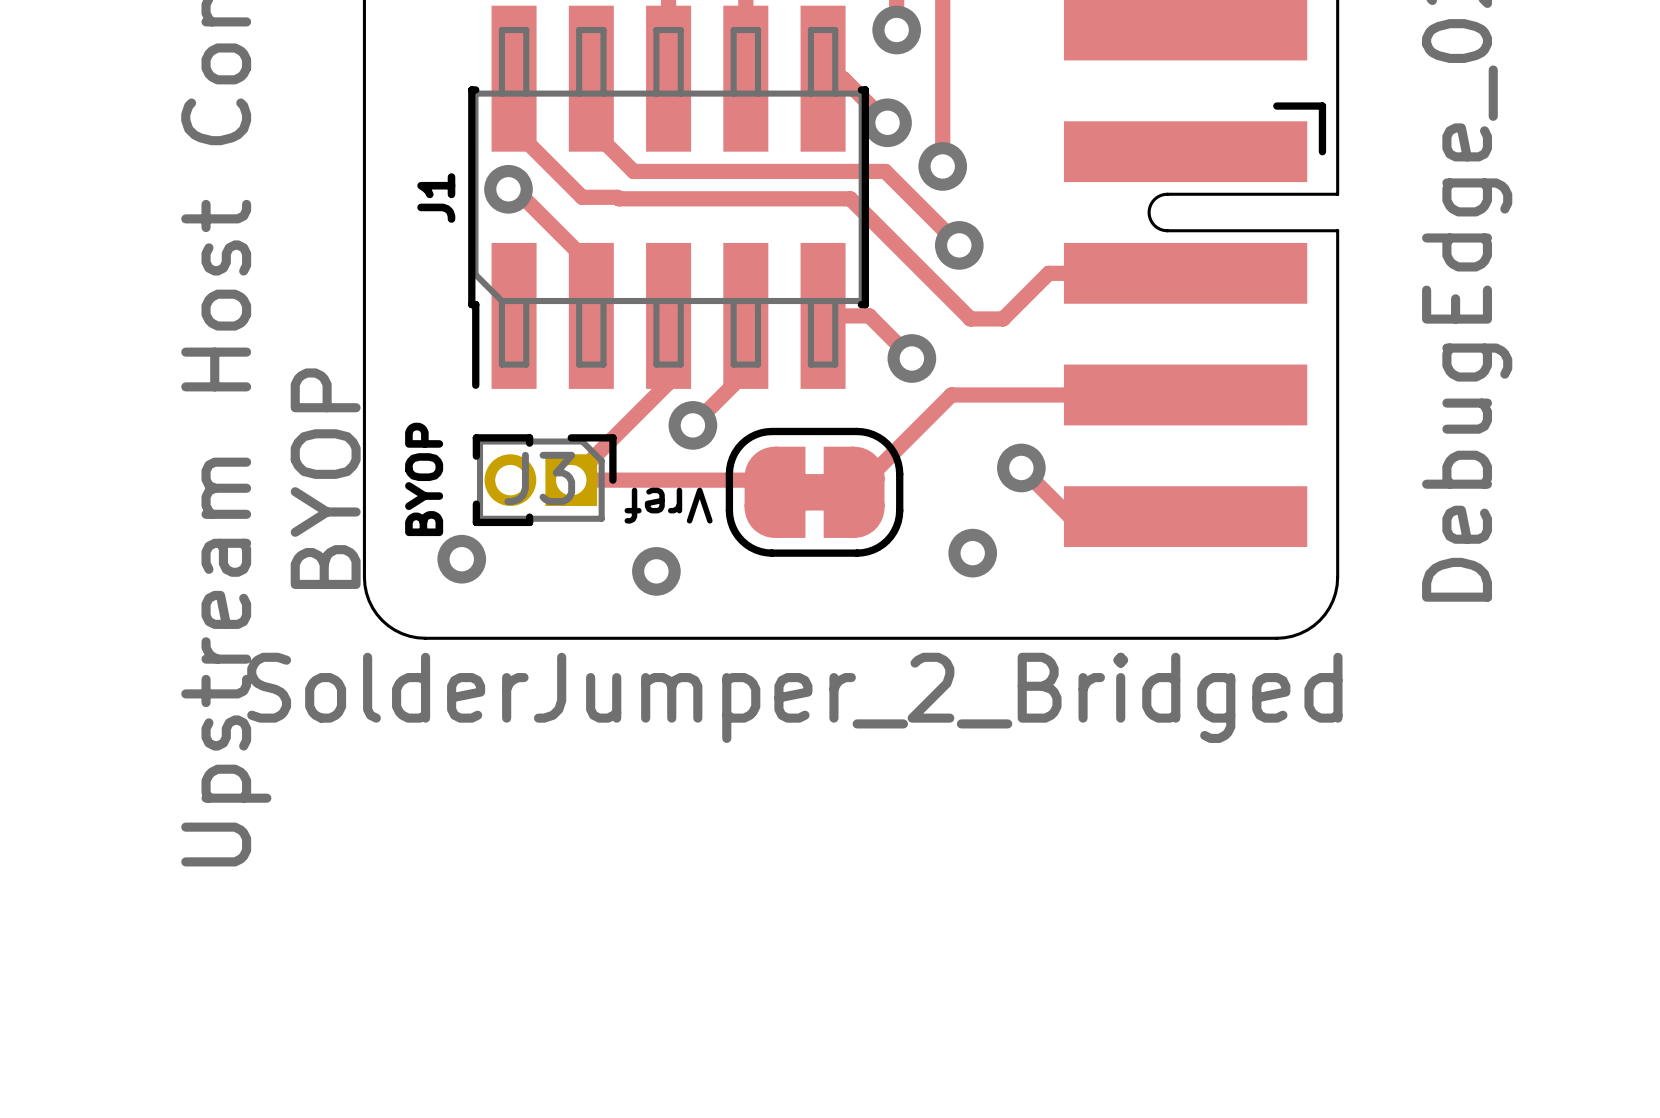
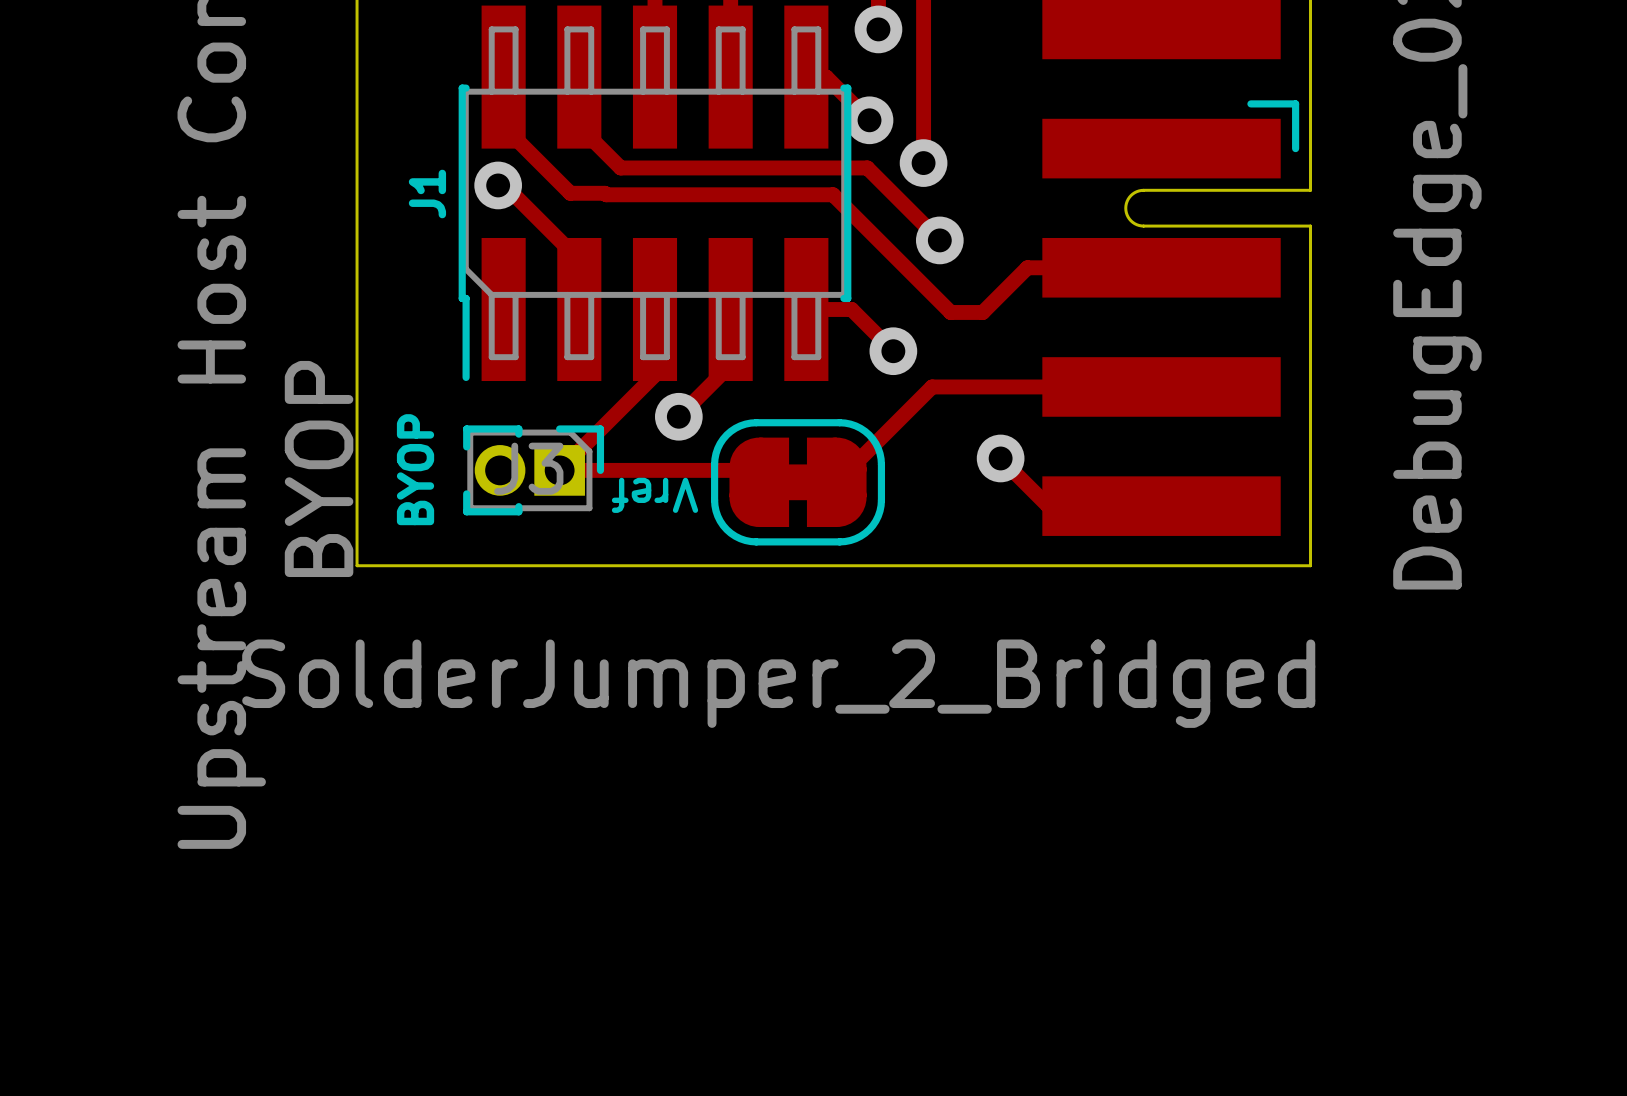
via: (972, 553) -> none
via: (461, 559) -> none
via: (656, 571) -> none
board edge: (364, 577) (369, 600) (382, 620) (401, 633) (425, 638) (1284, 637) (1307, 630) (1325, 614) (1335, 593) (1337, 577) -> (357, 565) (1310, 565)

